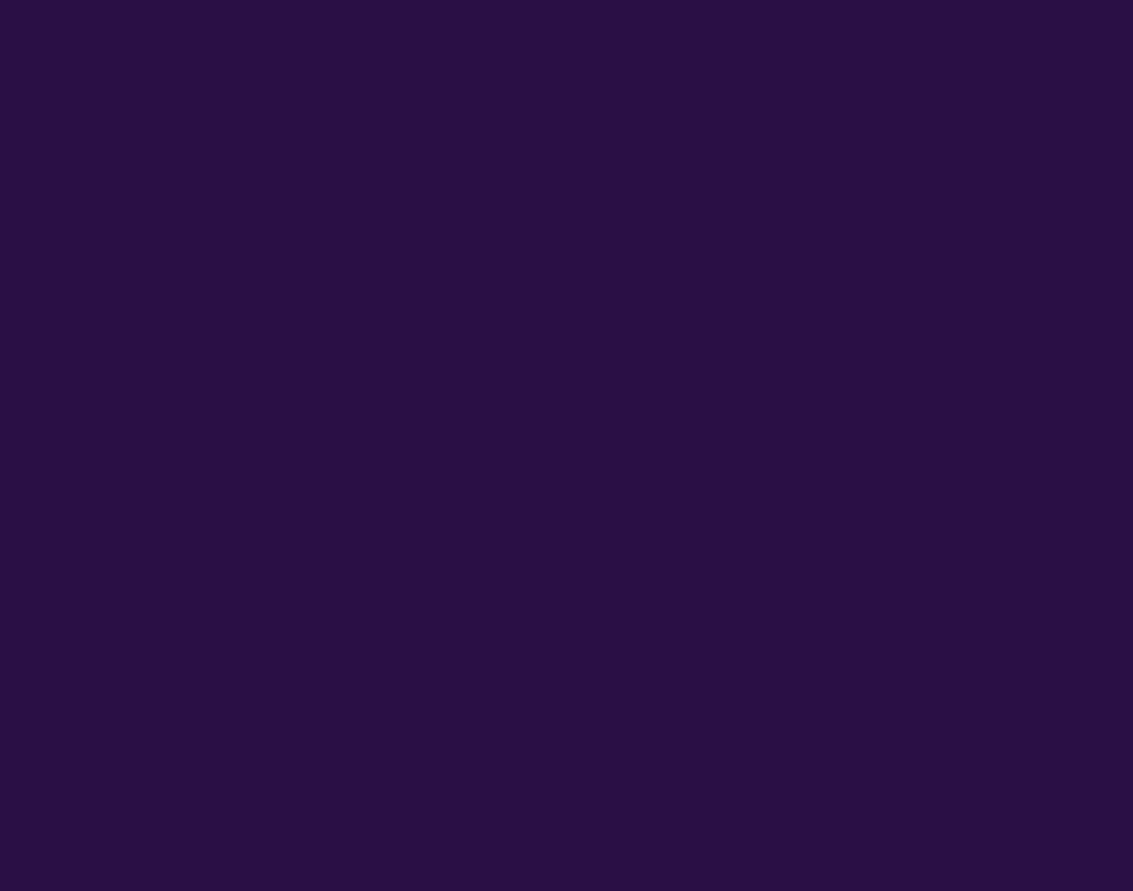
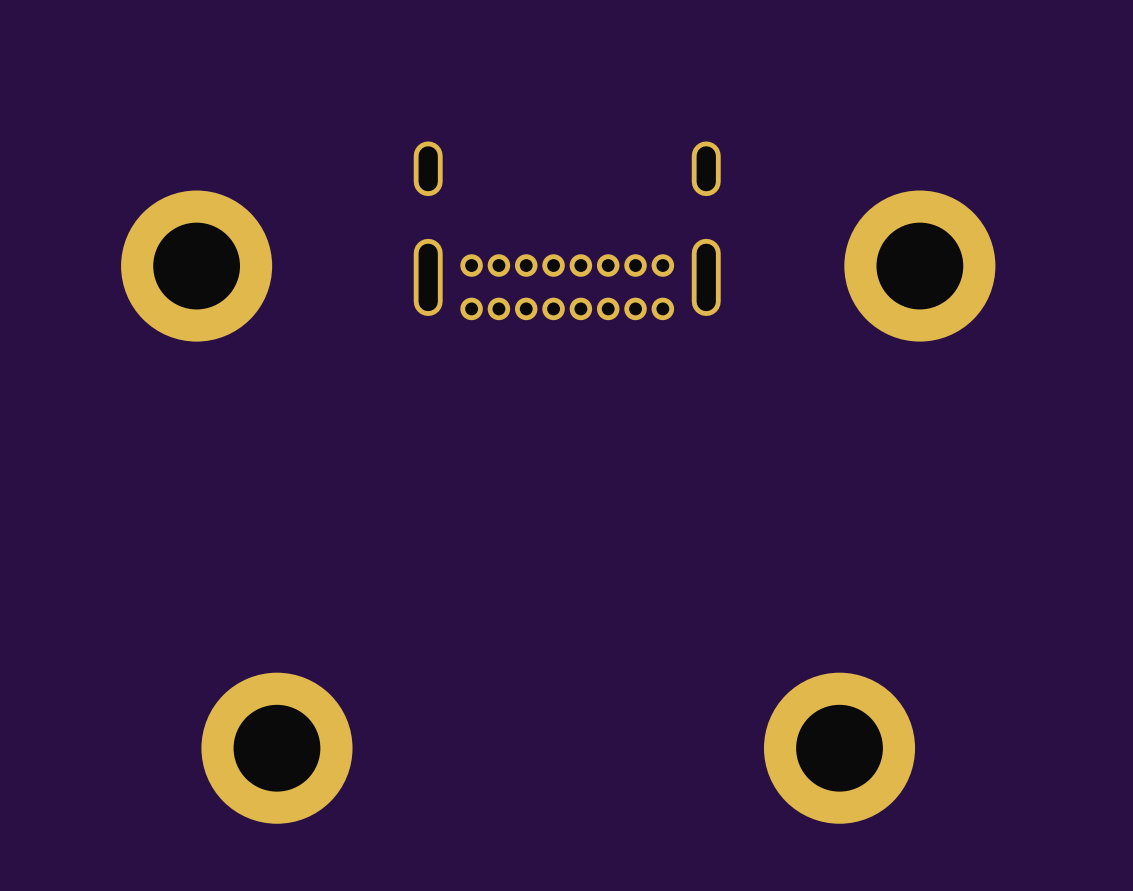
part: none -> (567, 230)
part: none -> (196, 266)
part: none -> (919, 266)
part: none -> (276, 748)
part: none -> (839, 748)

